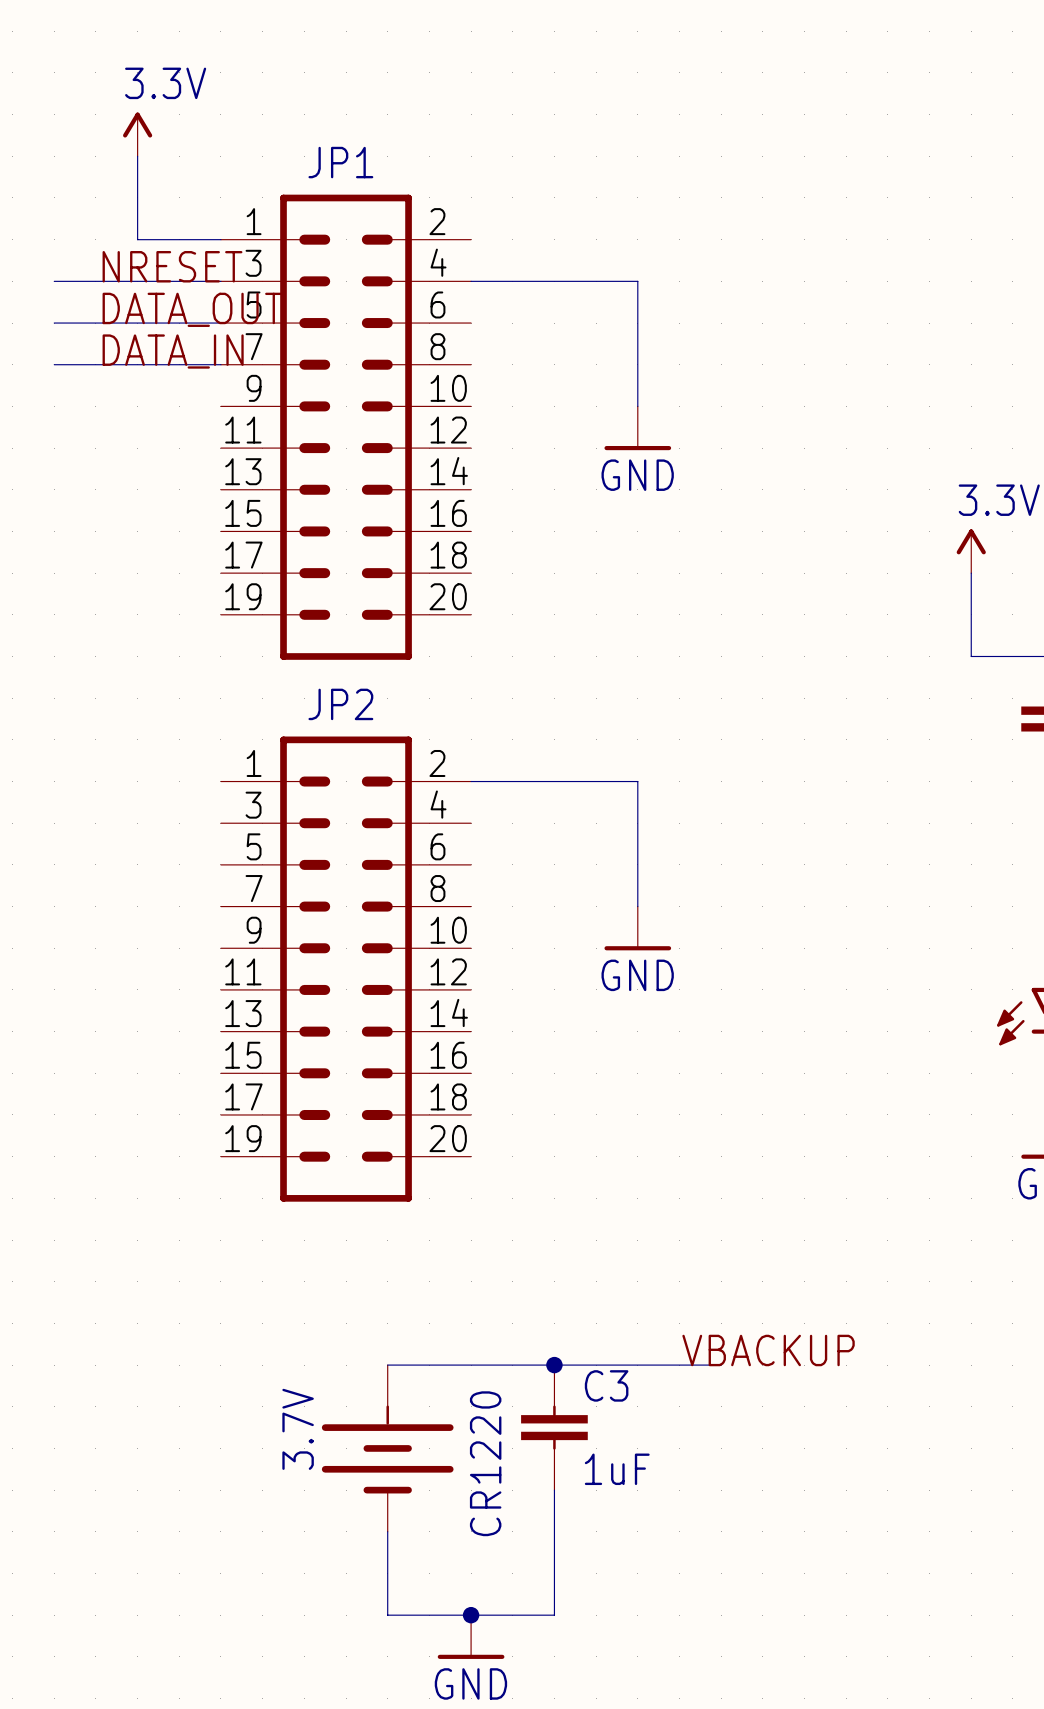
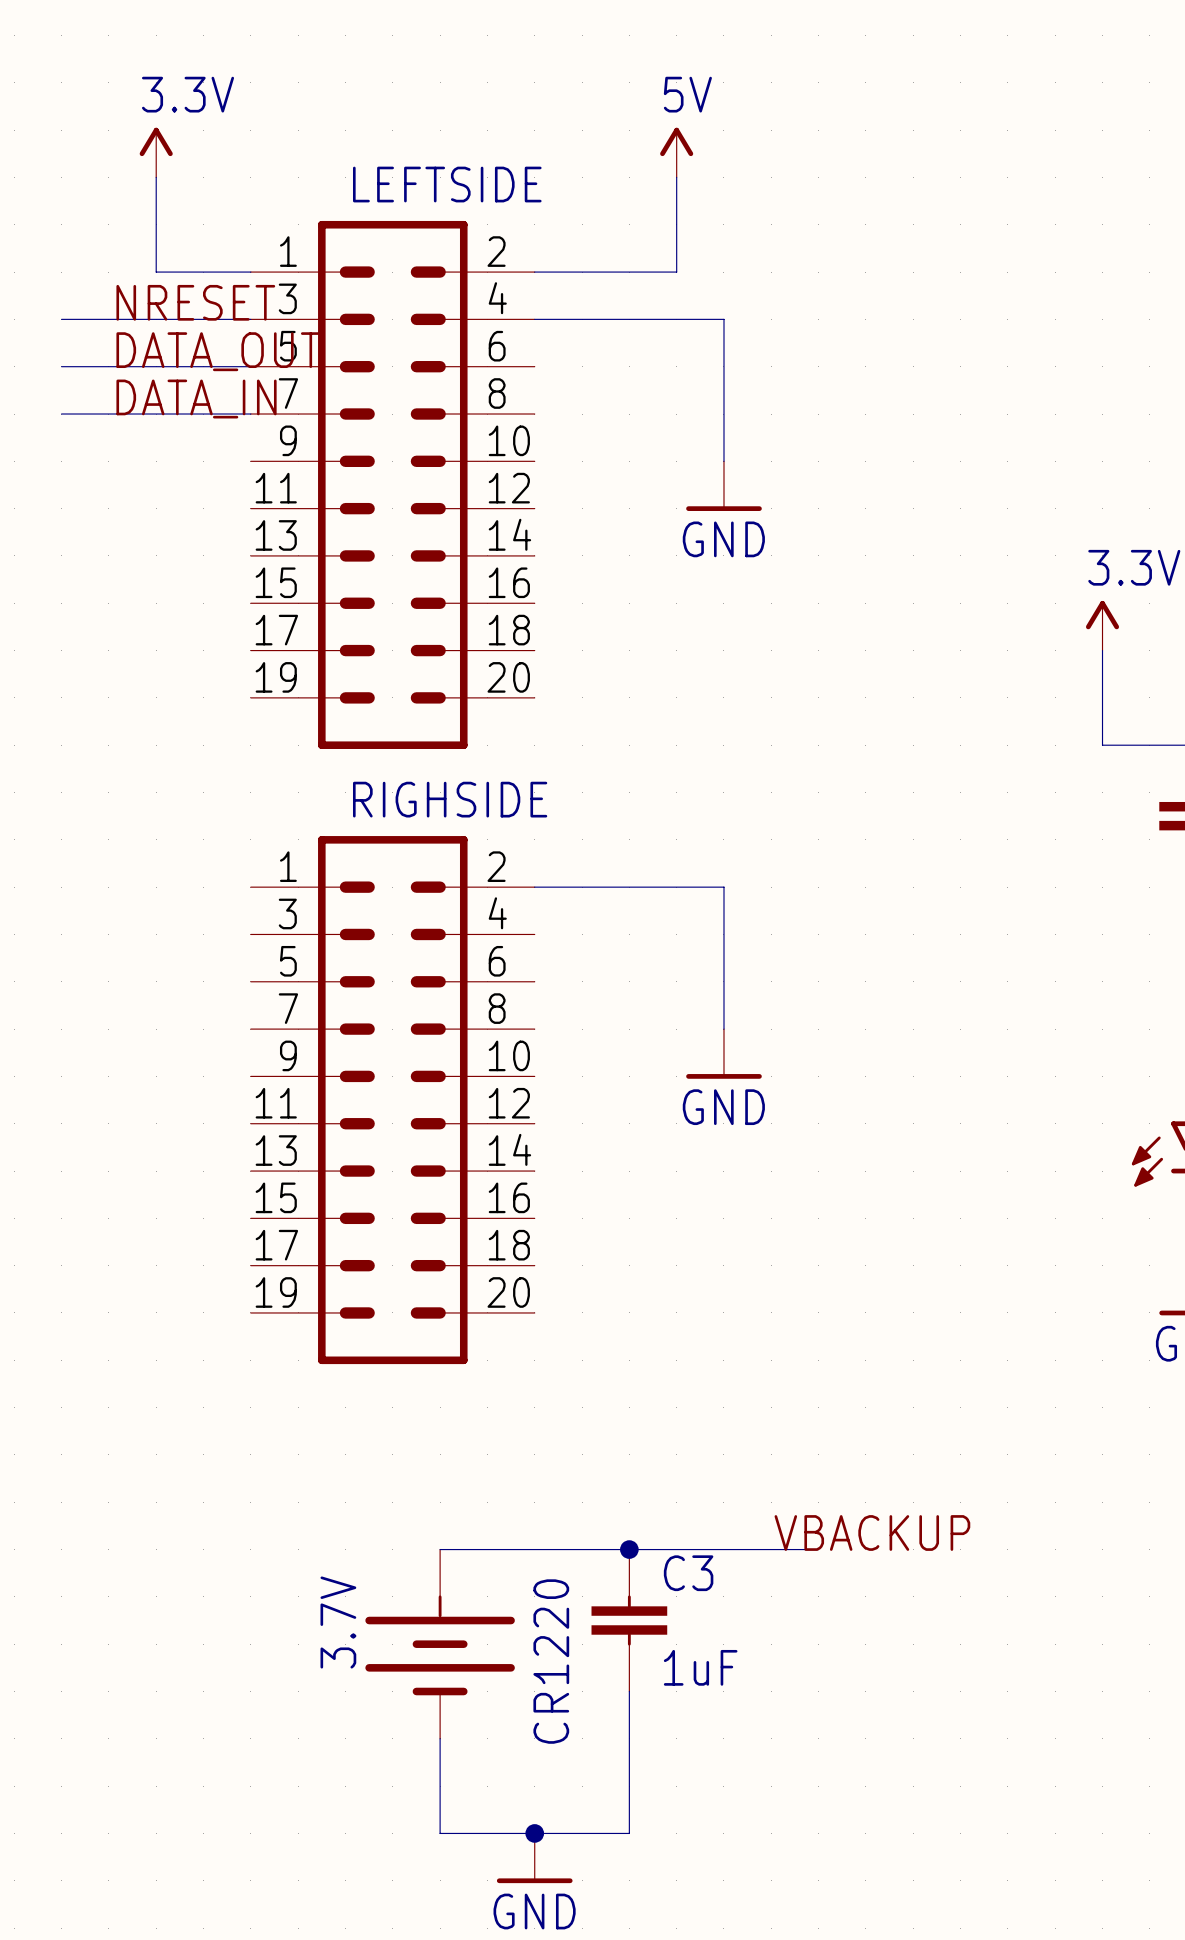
power symbol: none -> 5V (676, 152)
wire: none -> (676, 177) (676, 272) (534, 272)
JP1 name: JP1 (340, 162) -> LEFTSIDE (447, 184)
JP2 name: JP2 (340, 704) -> RIGHSIDE (450, 799)

